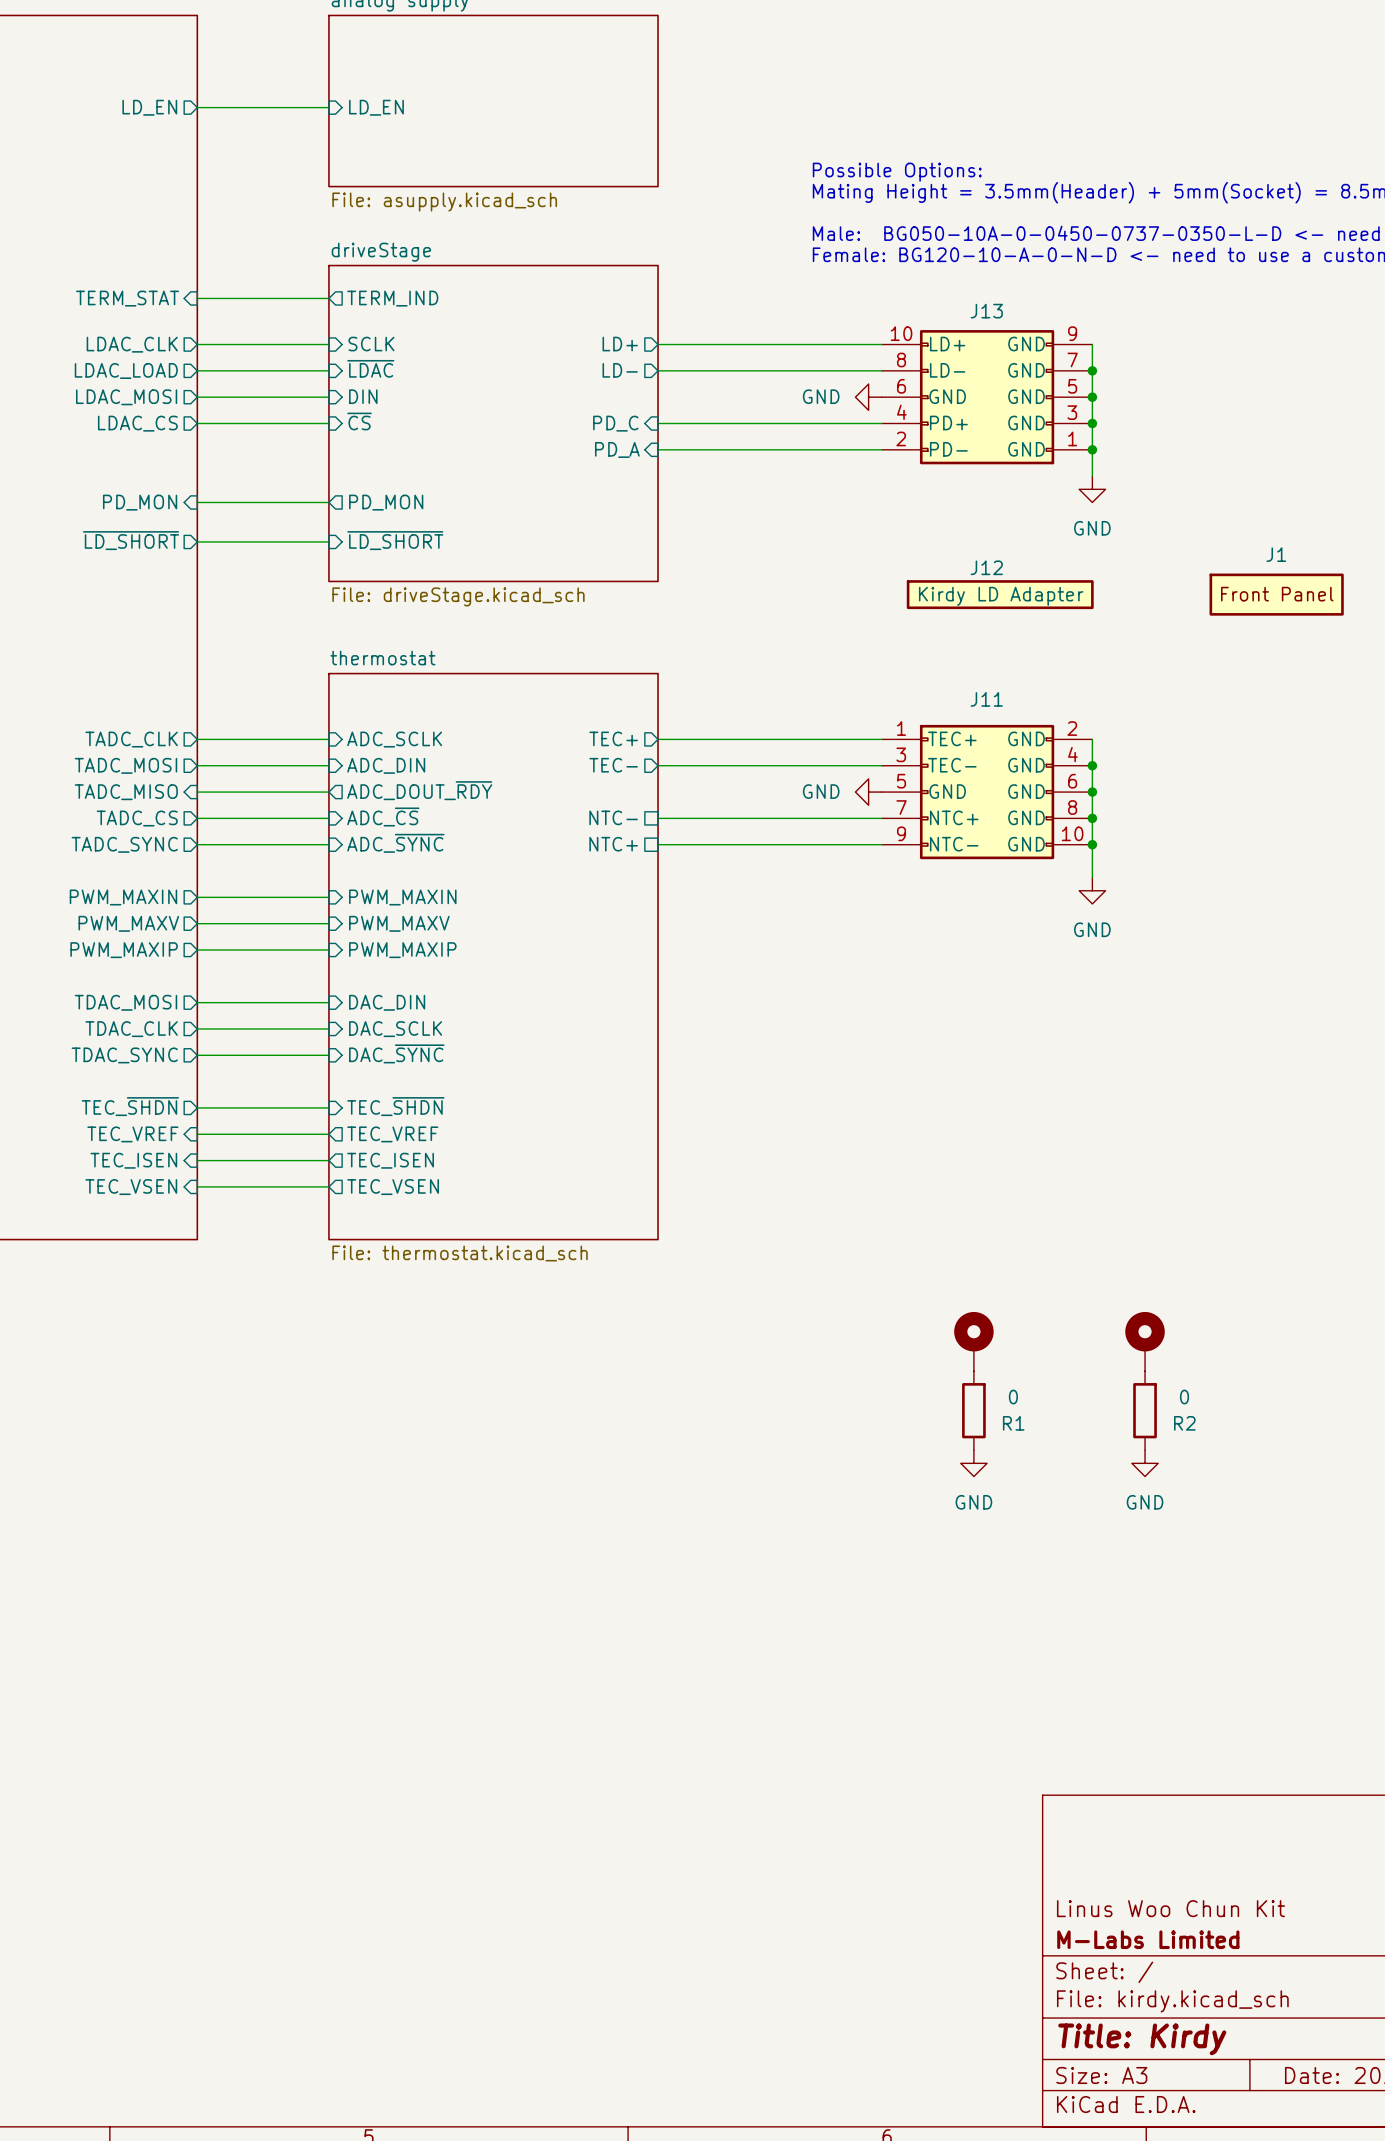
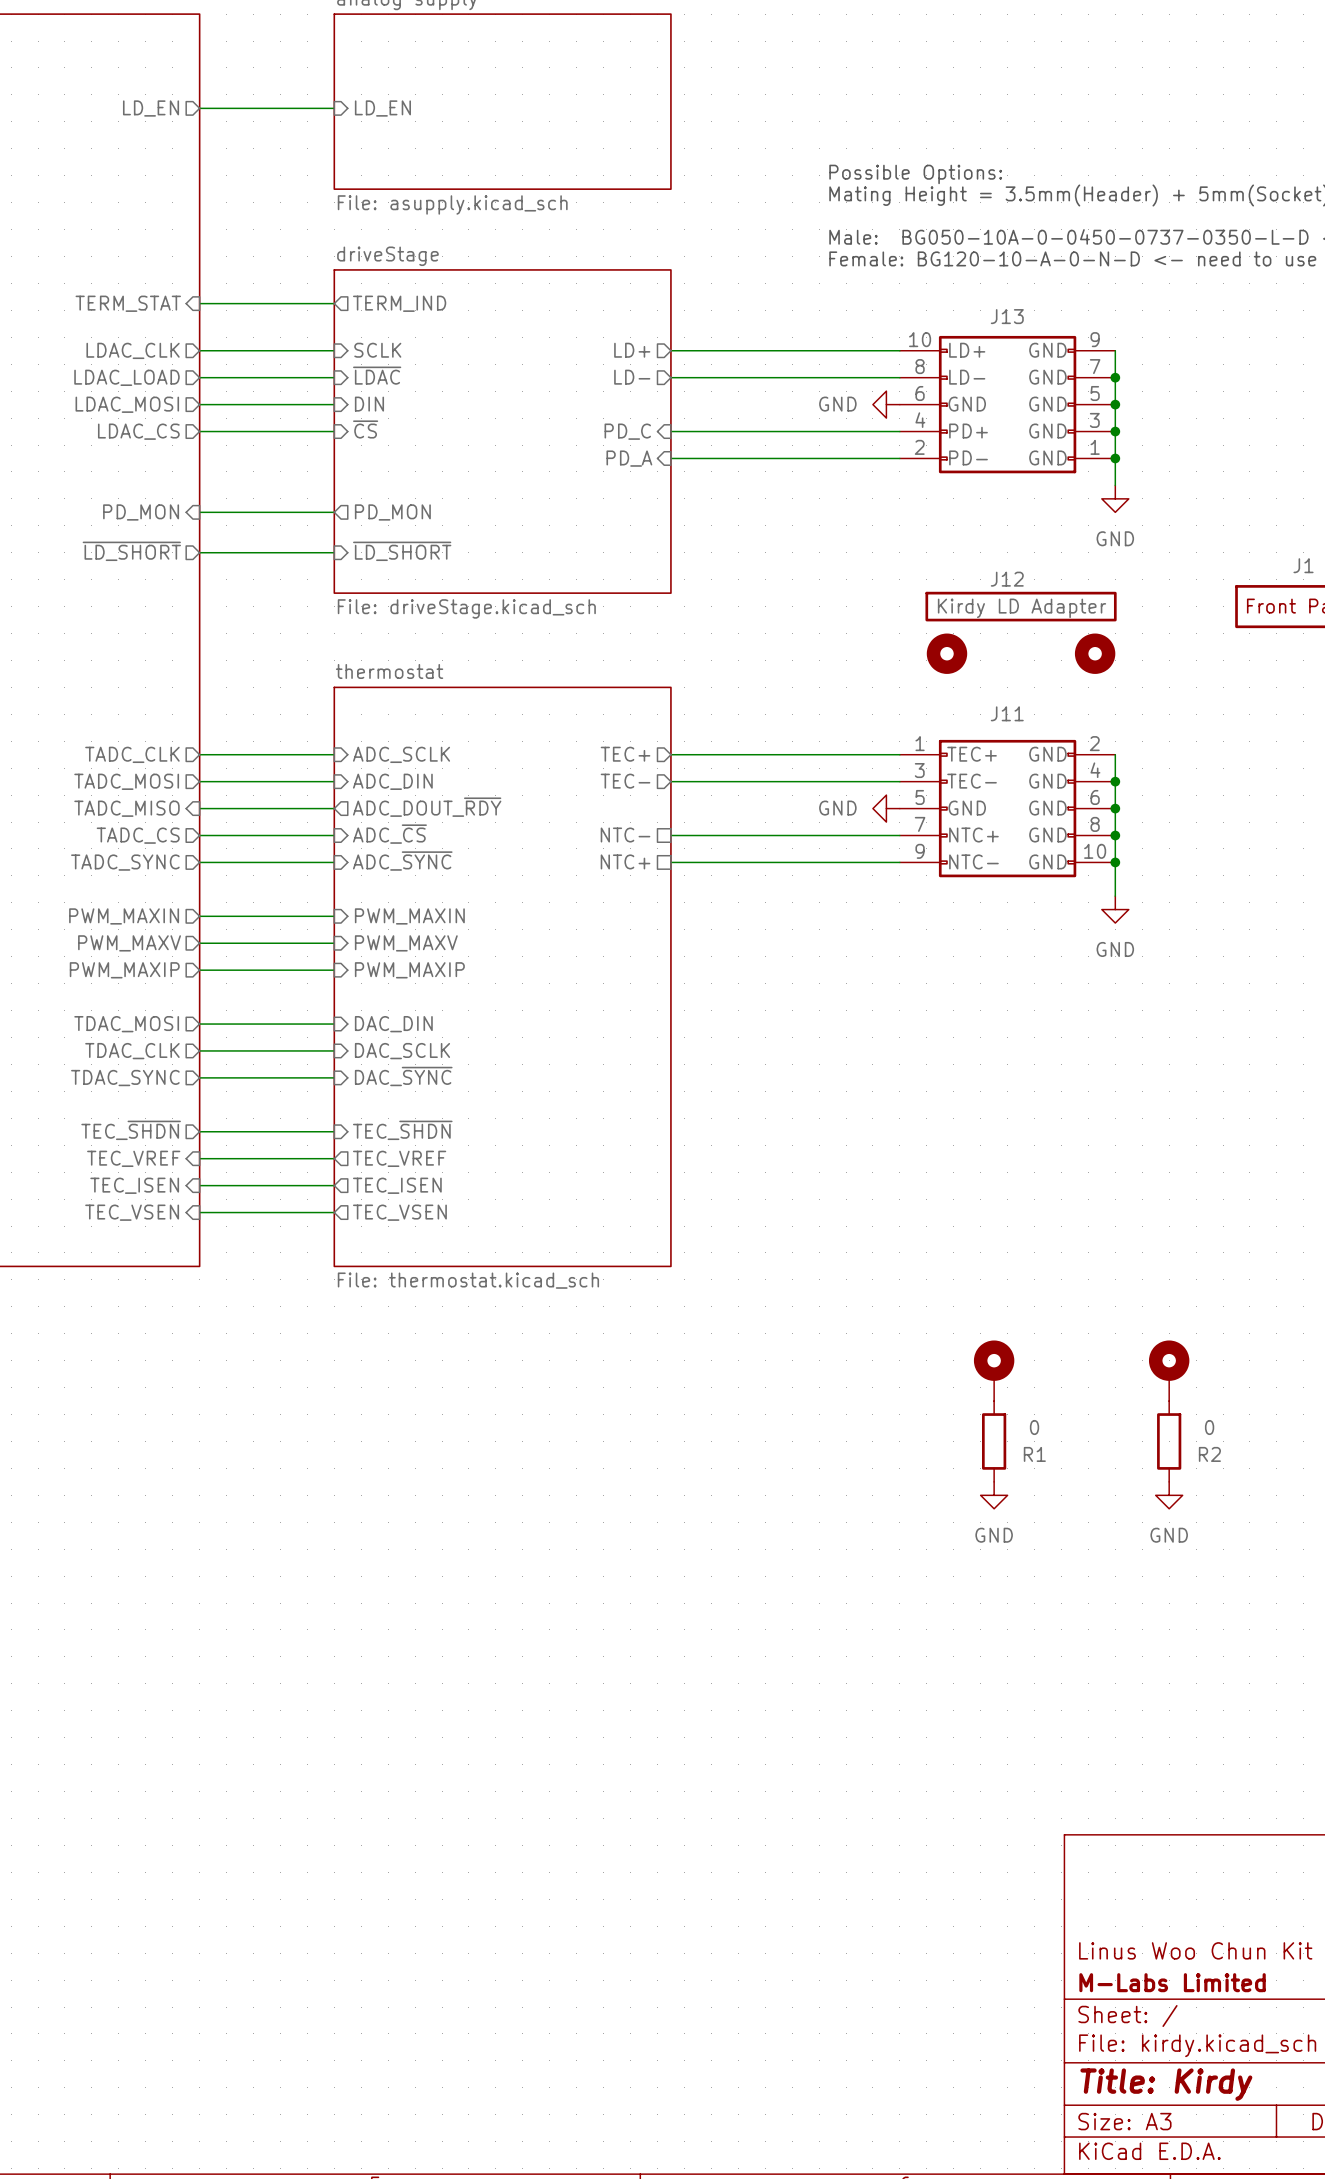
part: none -> (946, 653)
part: none -> (1095, 653)

